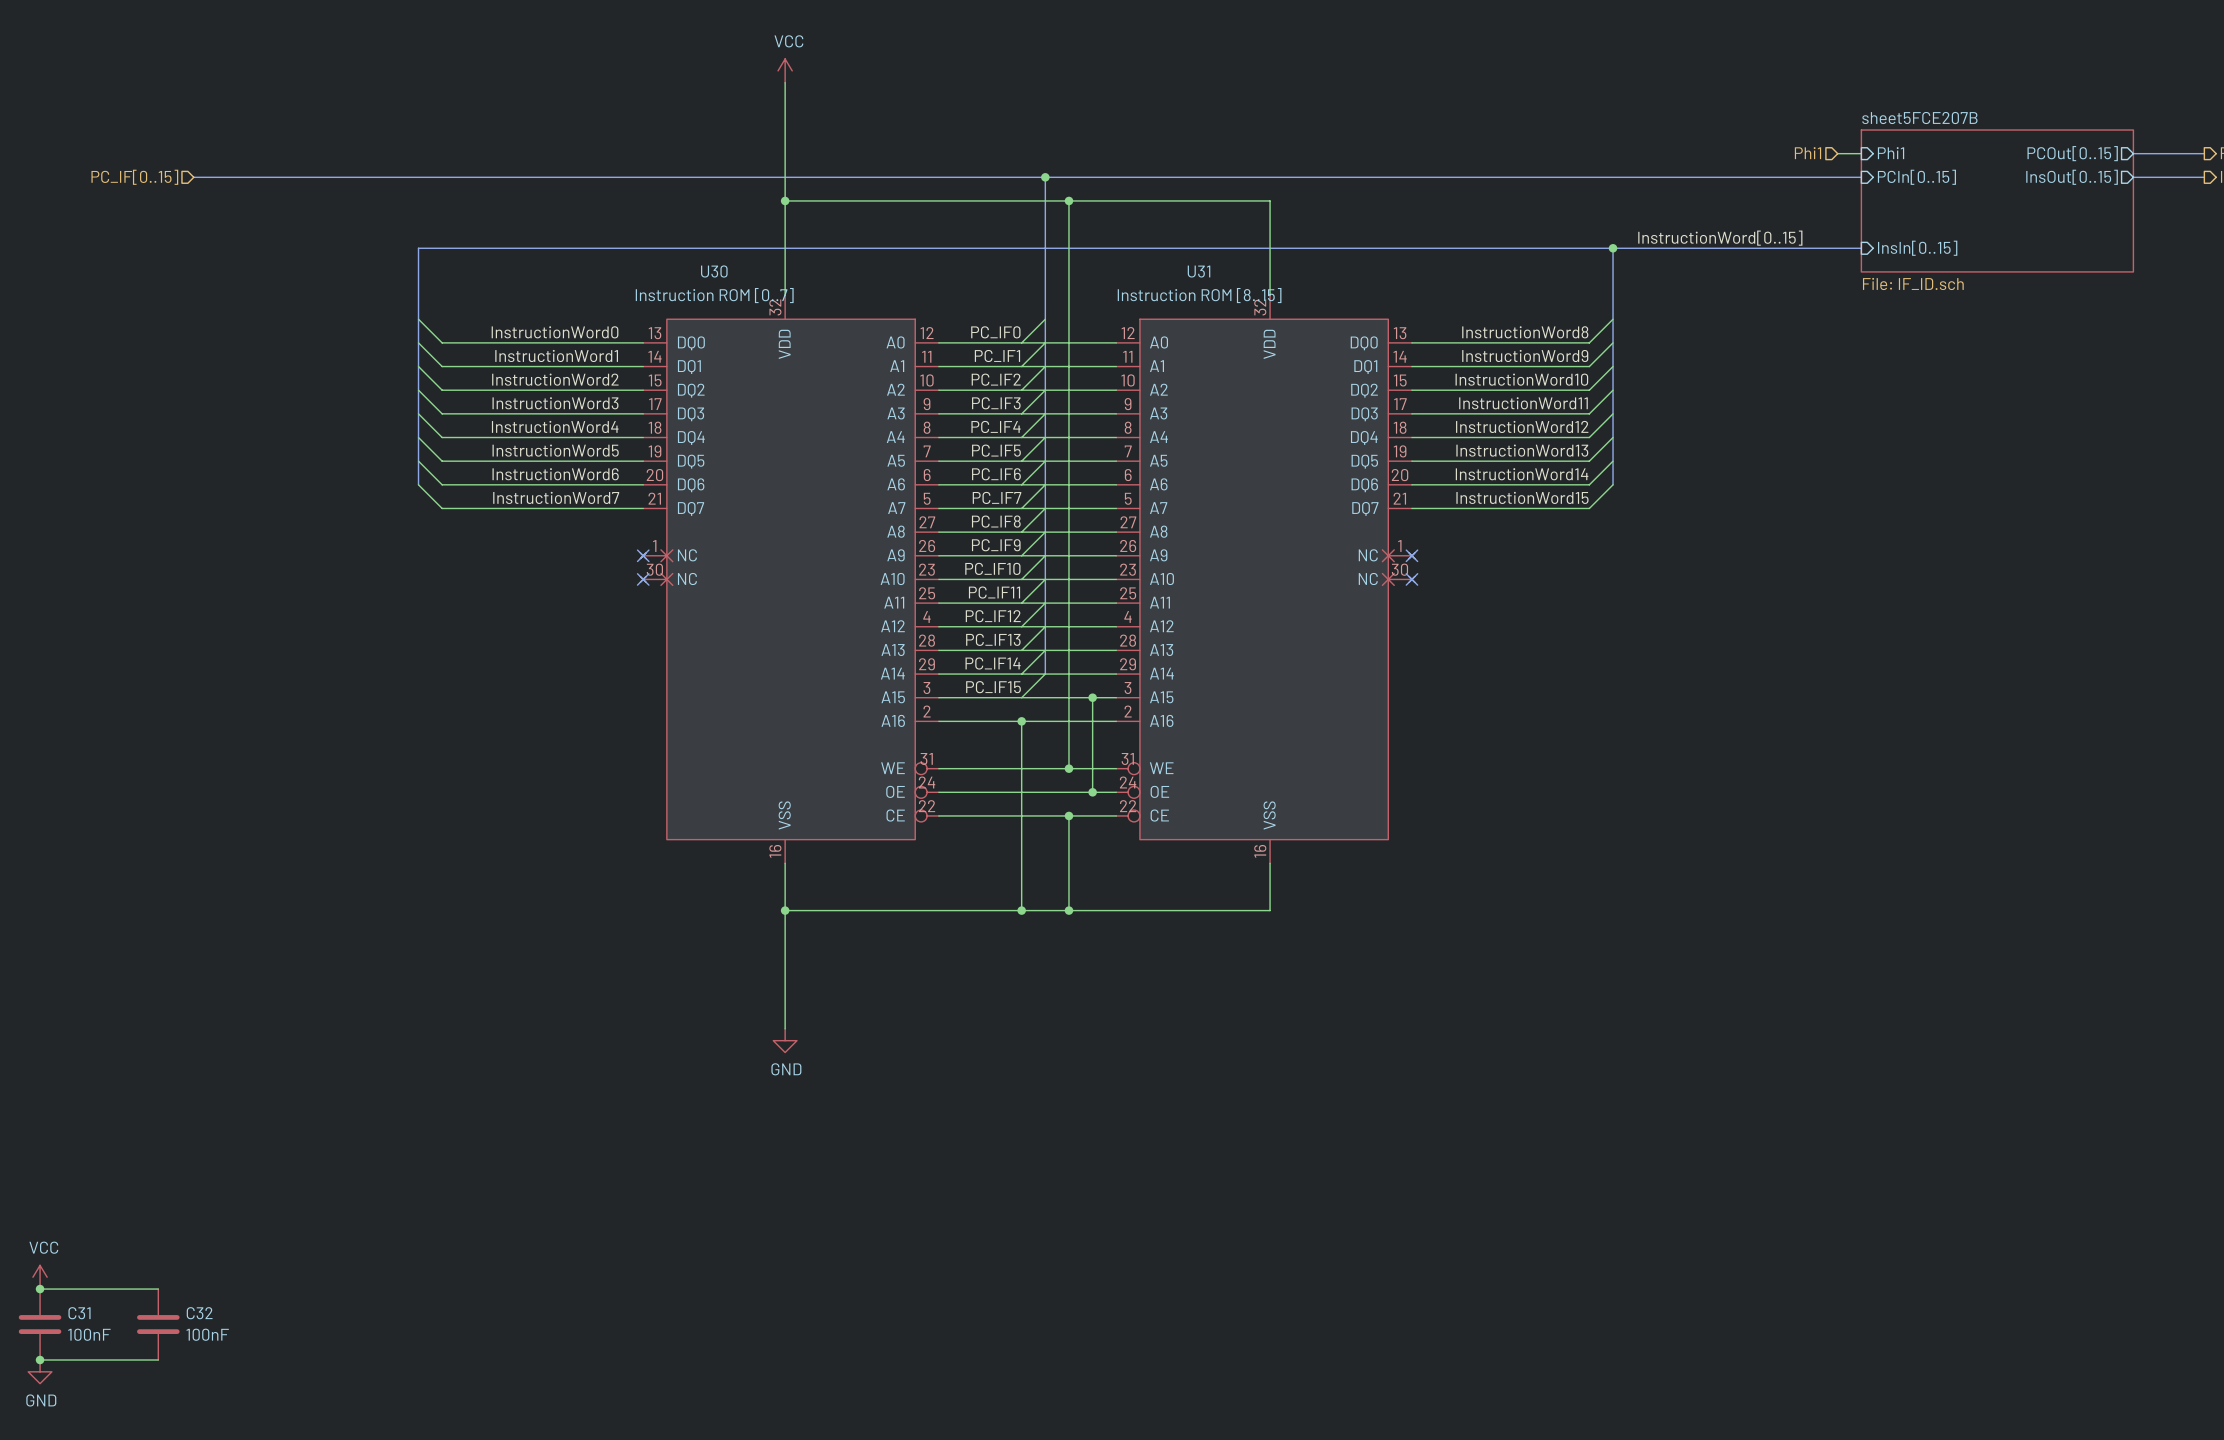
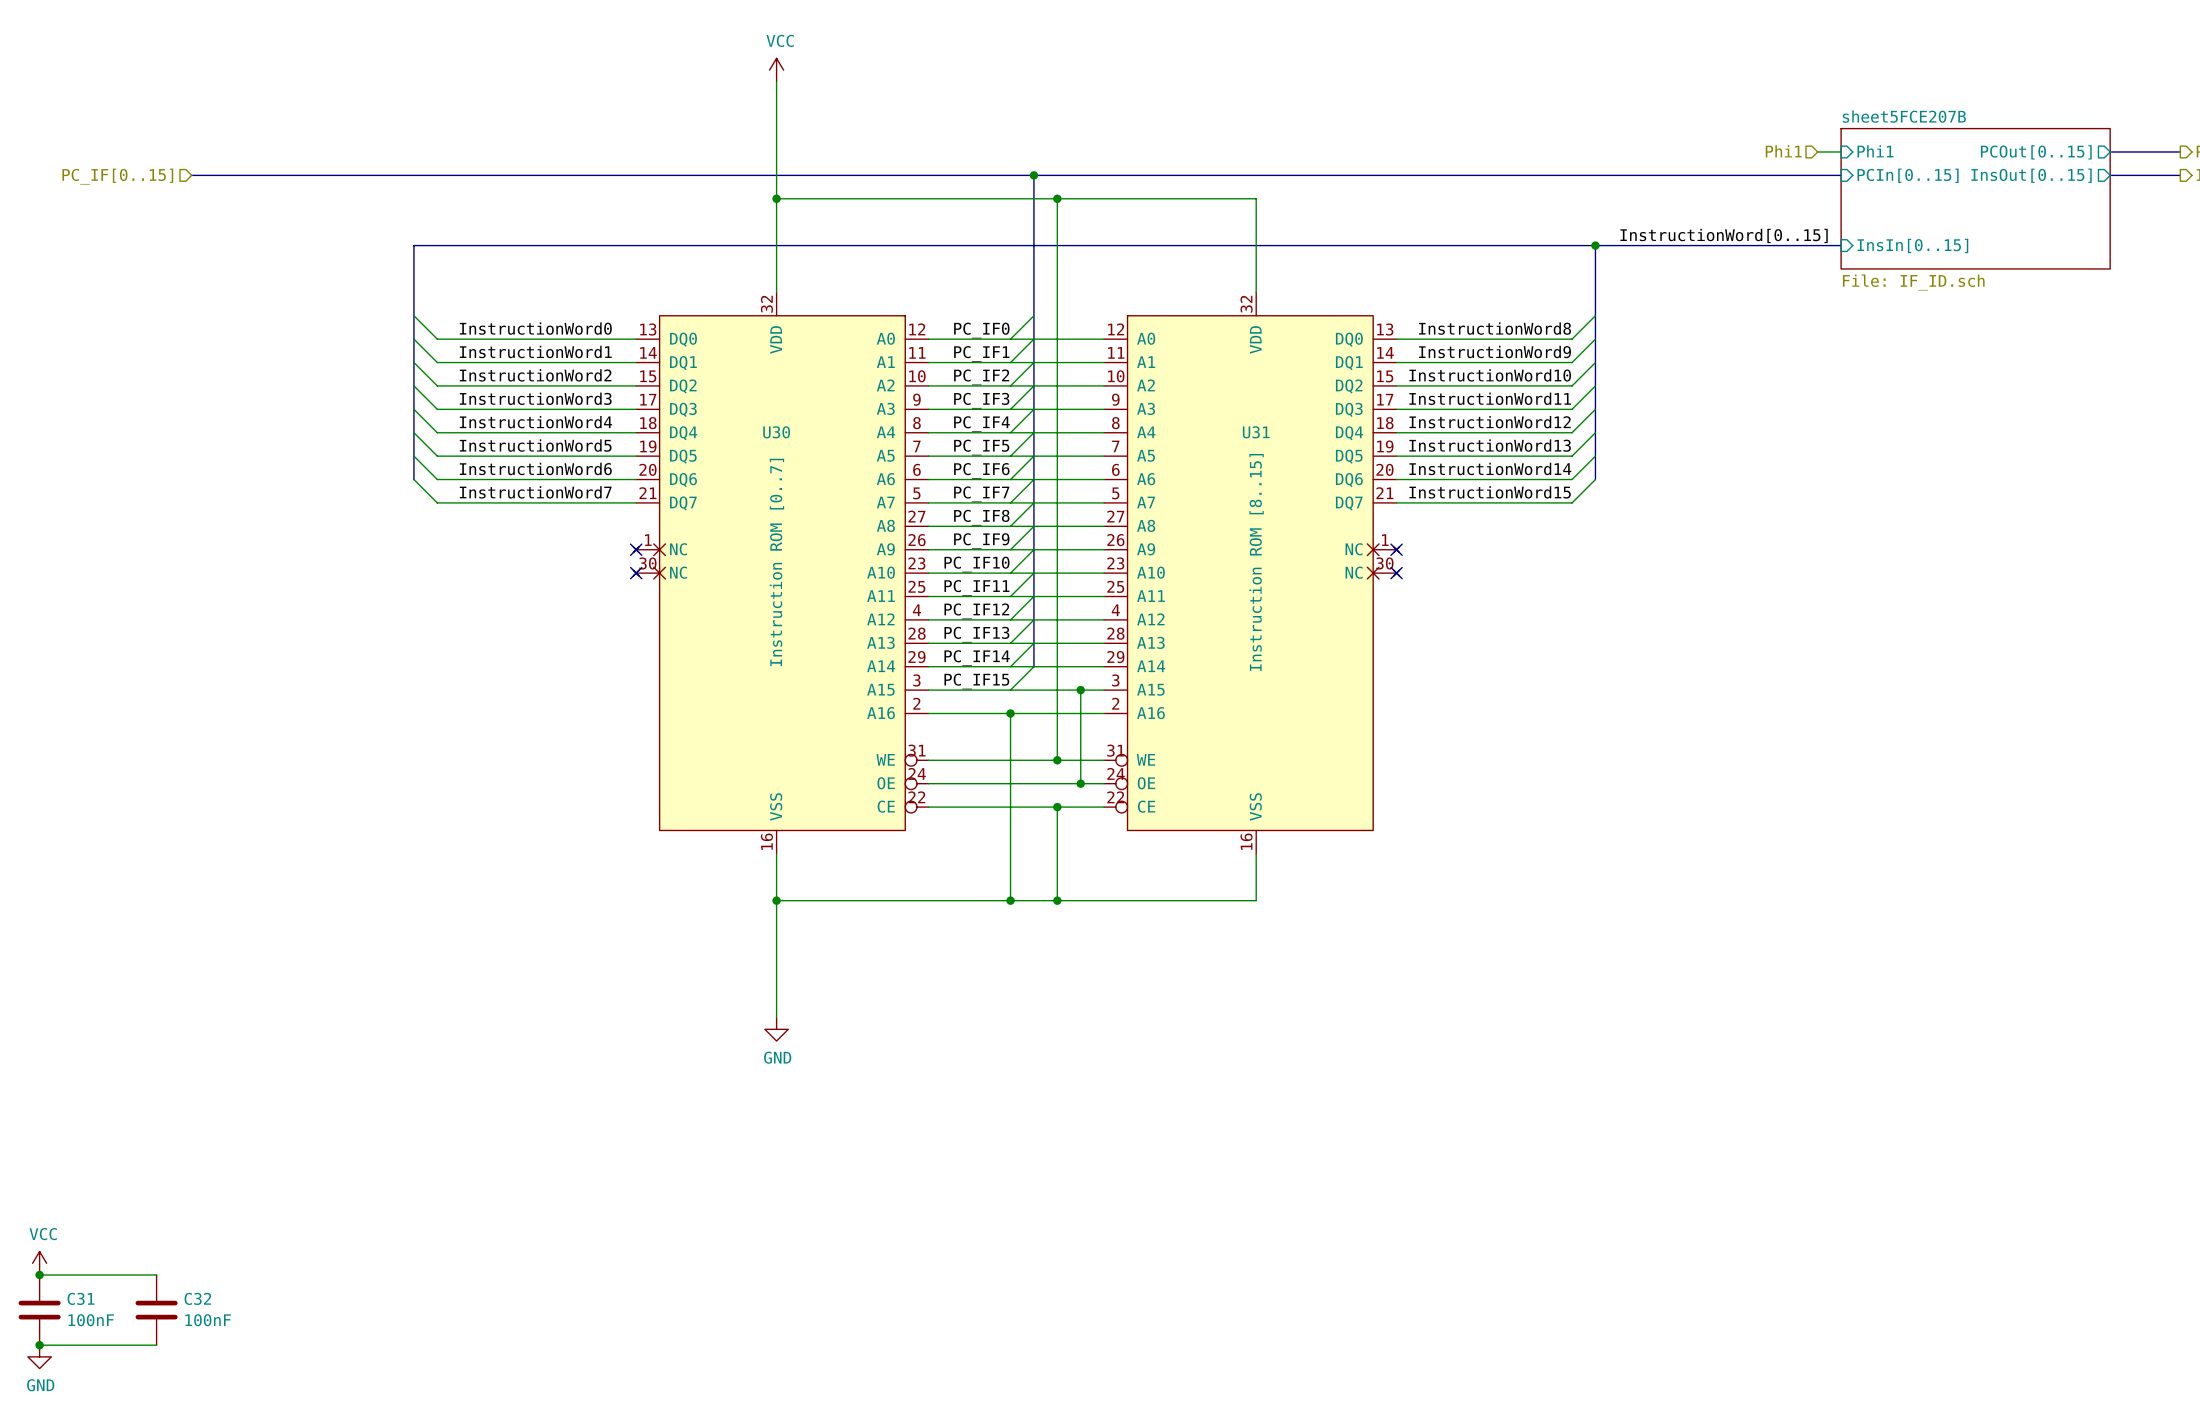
U30 name position: U30 (714, 271) -> U30 (776, 432)
U31 name position: U31 (1199, 271) -> U31 (1256, 432)
U30 value rotation: 0° (714, 295) -> 90° counterclockwise (776, 562)
U30 value position: Instruction ROM [0..7] (714, 295) -> Instruction ROM [0..7] (776, 562)
U31 value rotation: 0° (1199, 295) -> 90° counterclockwise (1256, 562)
U31 value position: Instruction ROM [8..15] (1199, 295) -> Instruction ROM [8..15] (1256, 562)

